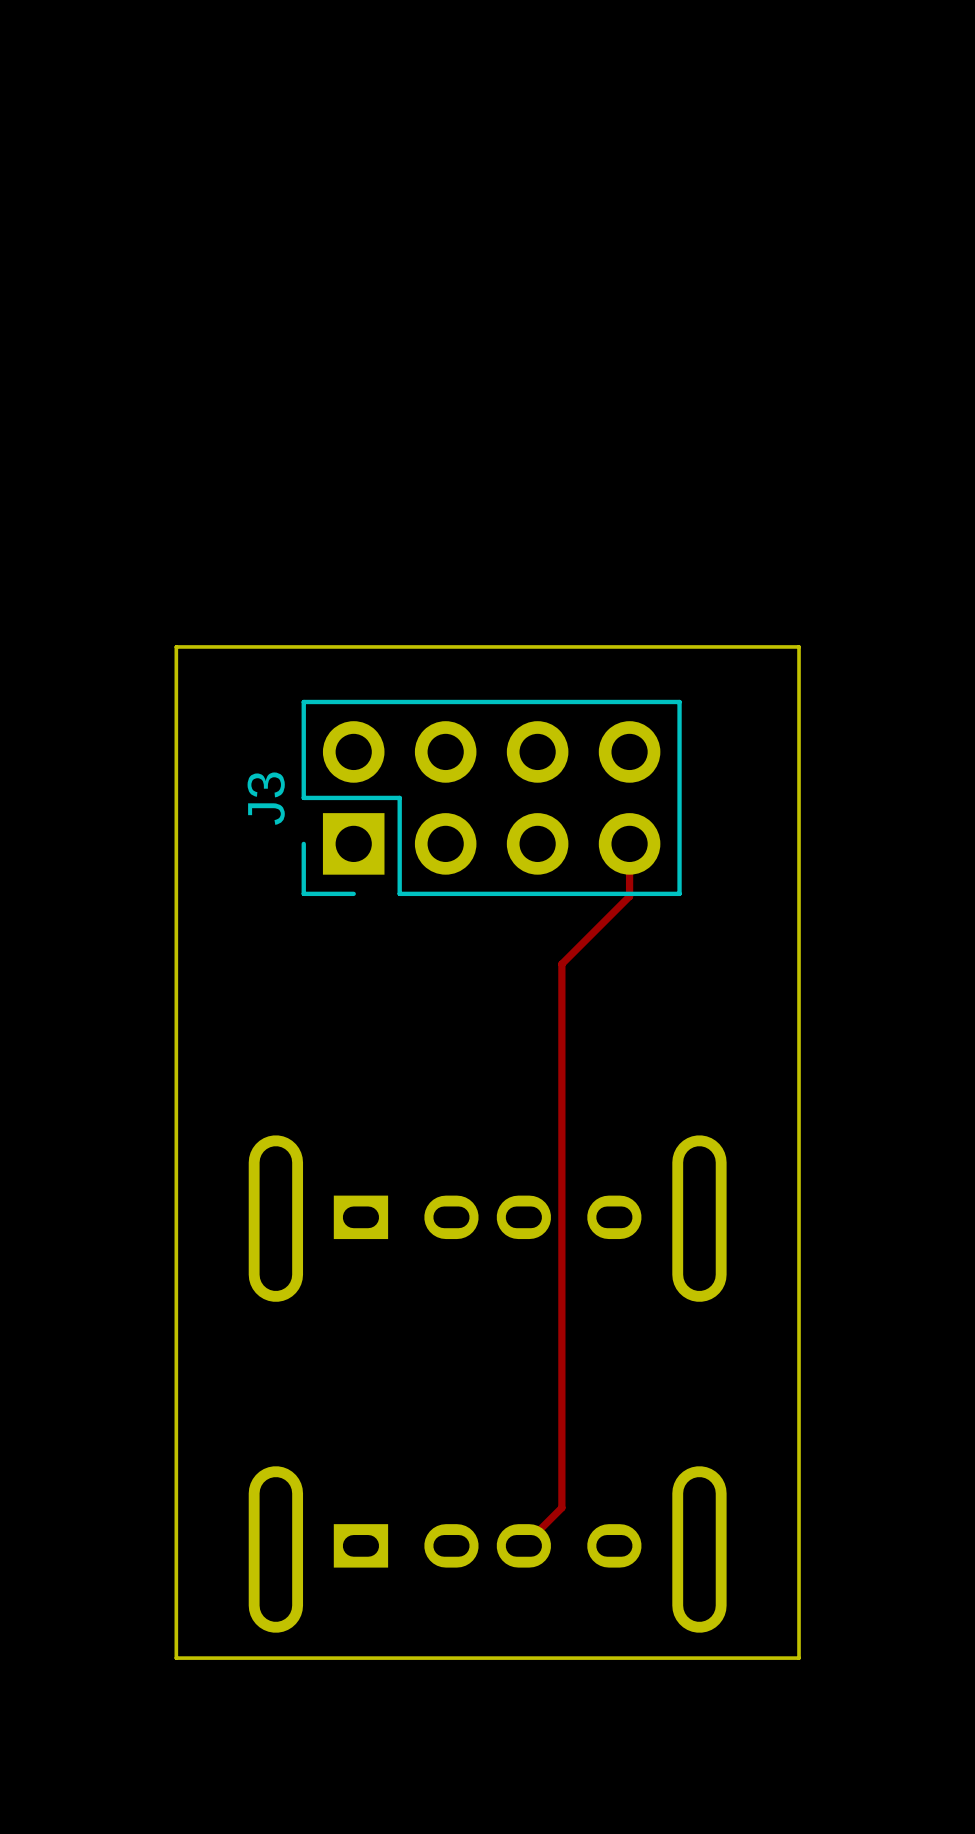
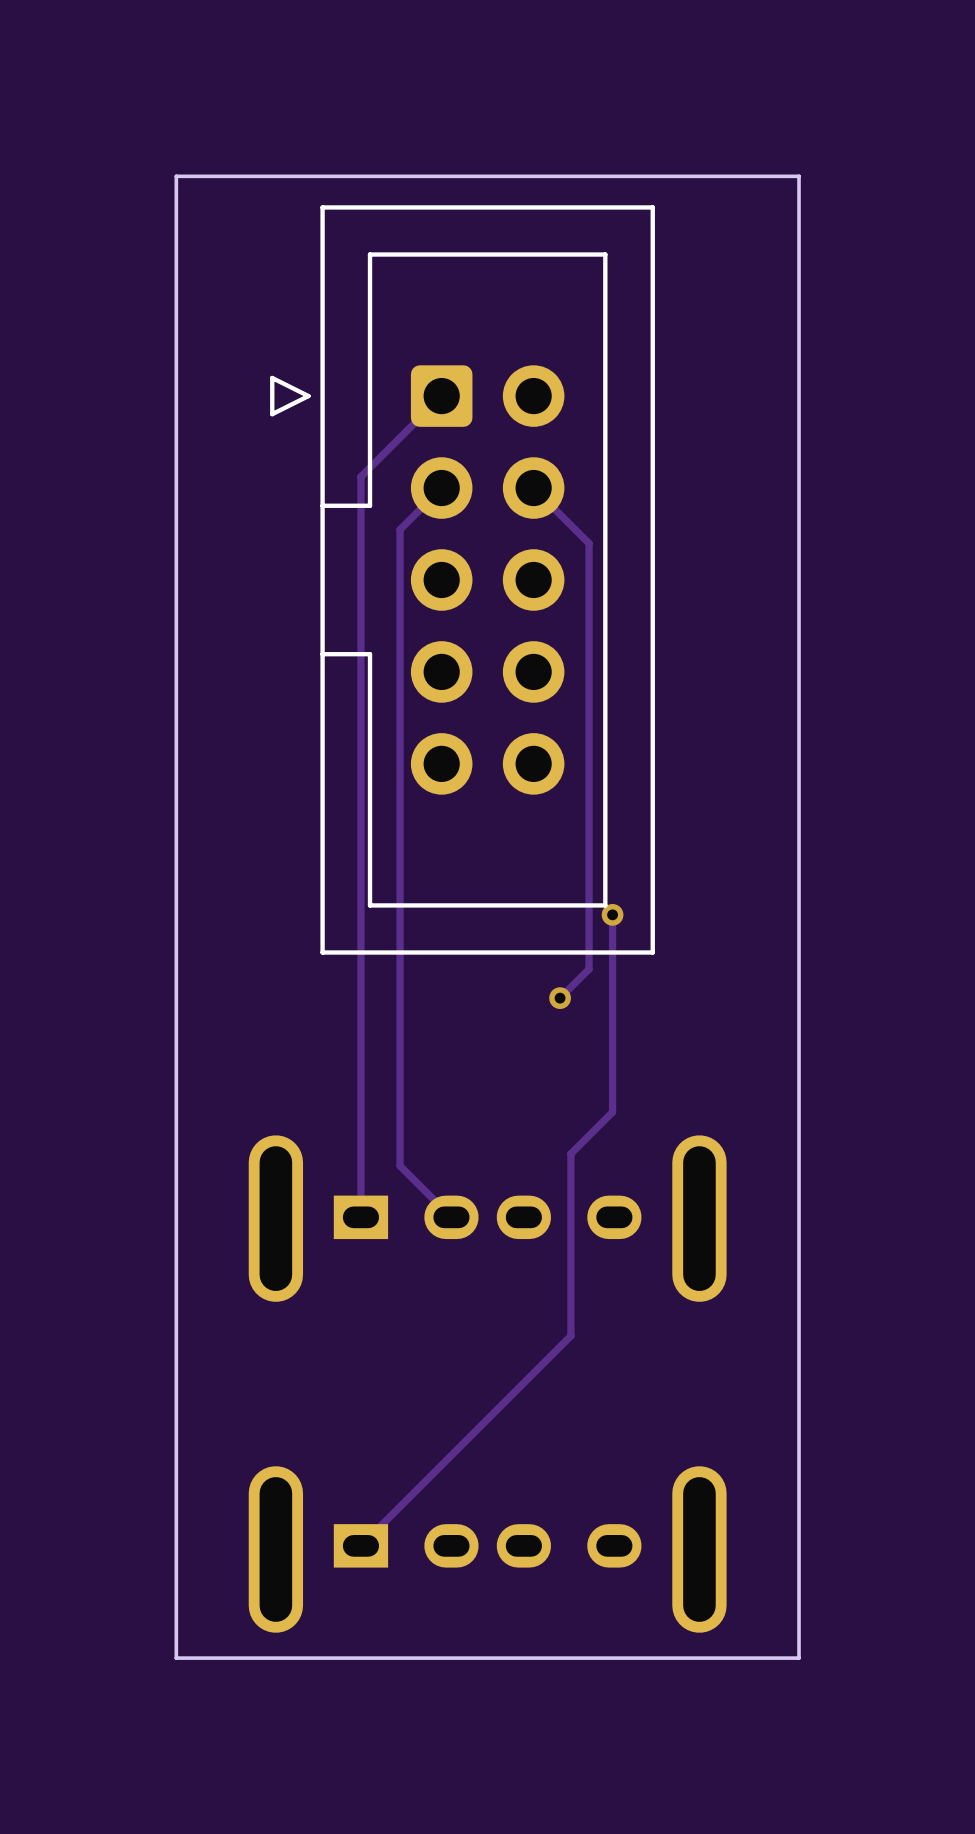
track: none -> (441, 396) (360, 476) (360, 1217)
track: none -> (441, 488) (400, 529) (400, 1165) (451, 1217)
track: none -> (533, 488) (589, 543) (589, 969) (560, 998)
part: none -> (462, 579)
board edge: (176, 646) (799, 646) -> (176, 646) (176, 176) (799, 176) (799, 646)
J3: (491, 797) -> none
track: (629, 843) (629, 896) (561, 964) (561, 1507) (523, 1545) -> none
track: none -> (612, 914) (612, 1112) (570, 1153) (570, 1335) (360, 1545)
via: none -> (612, 914)
via: none -> (560, 998)

